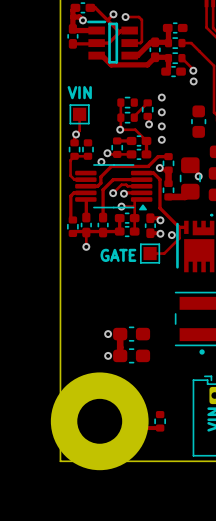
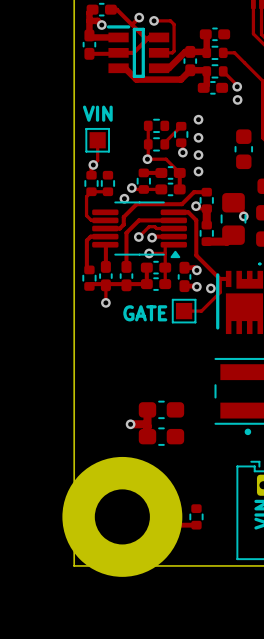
via: (108, 334) -> none
track: none -> (130, 424) (145, 424) (147, 426)
via: none -> (130, 424)
via: (108, 355) -> none

